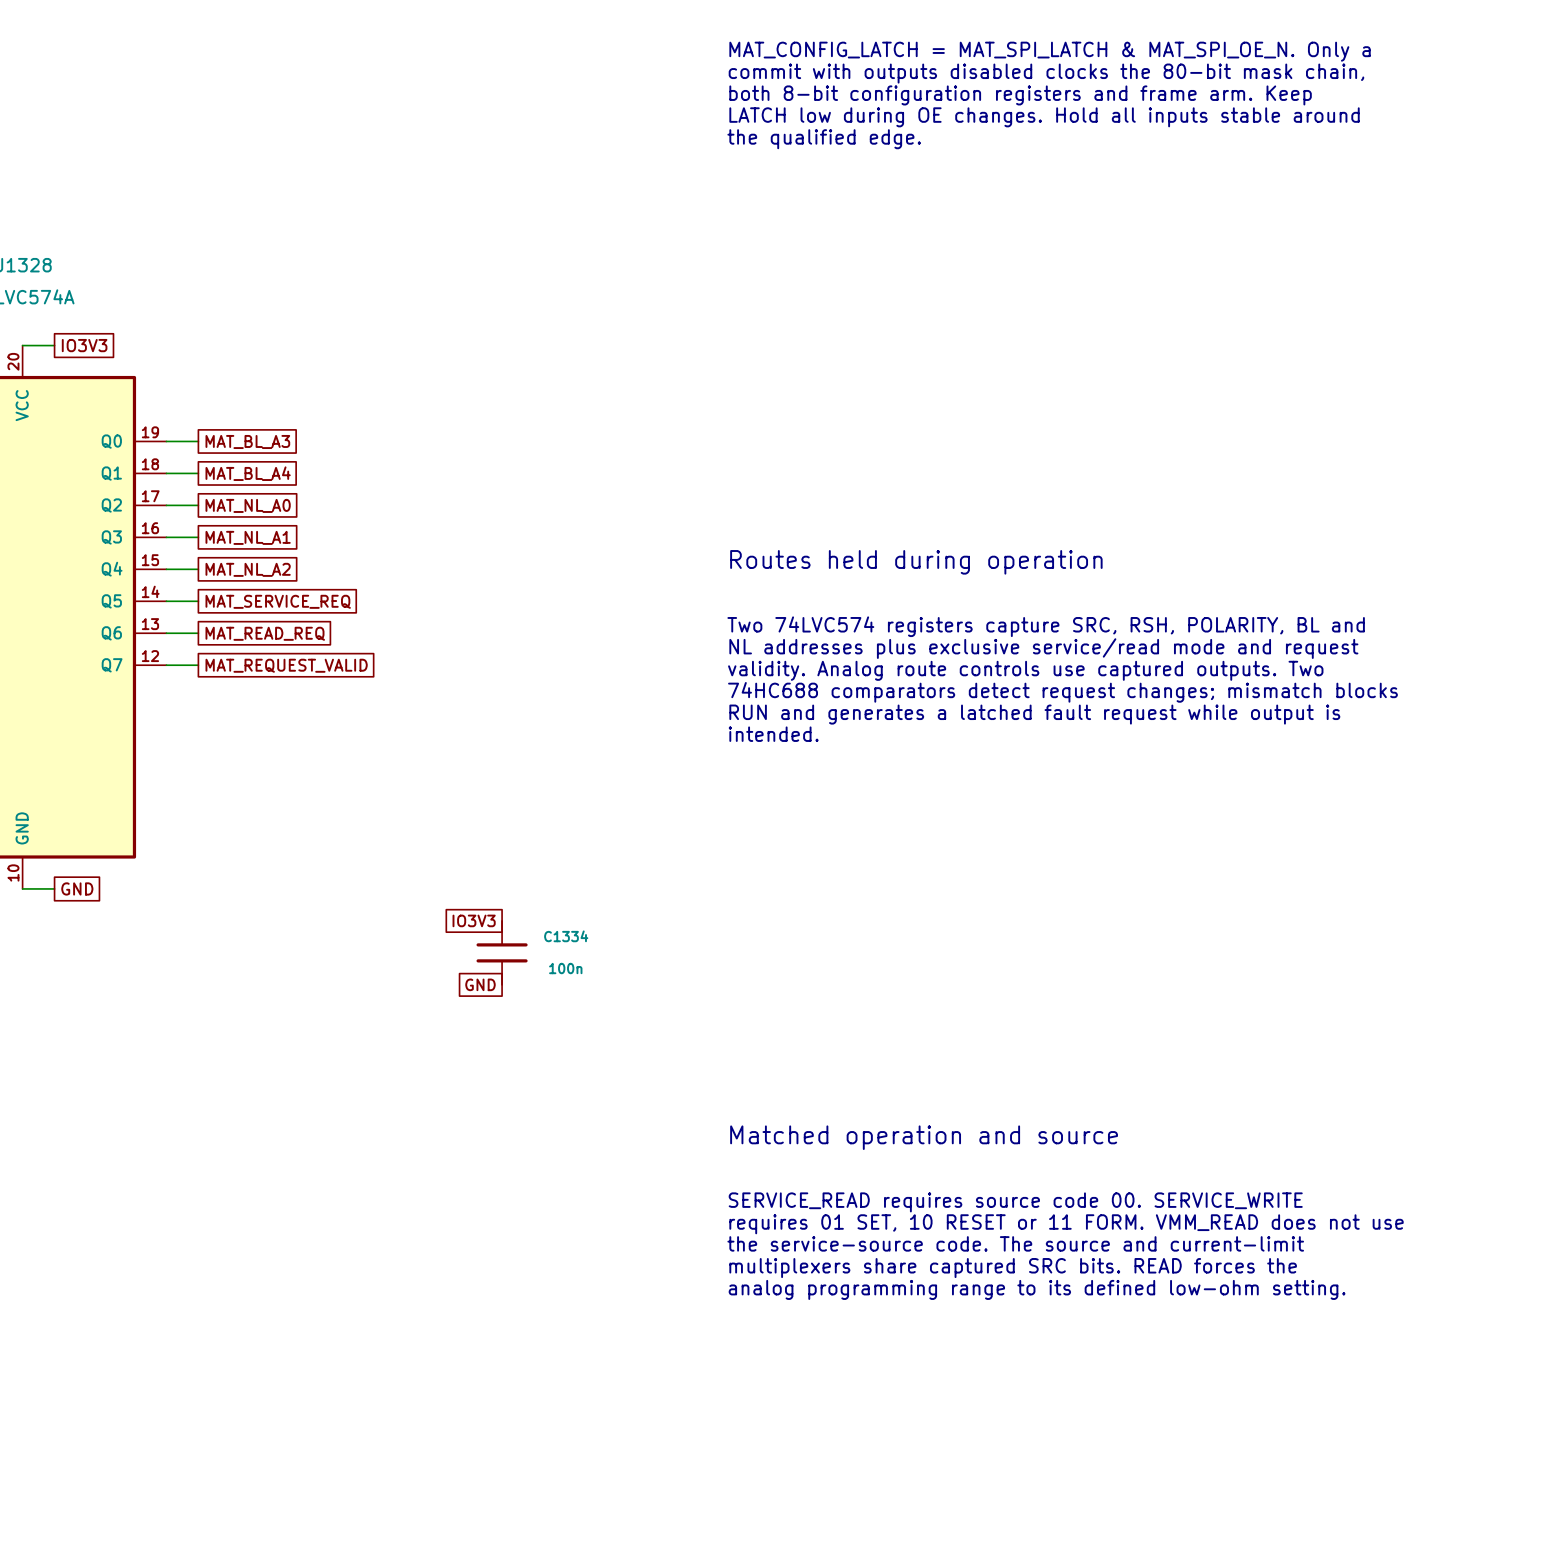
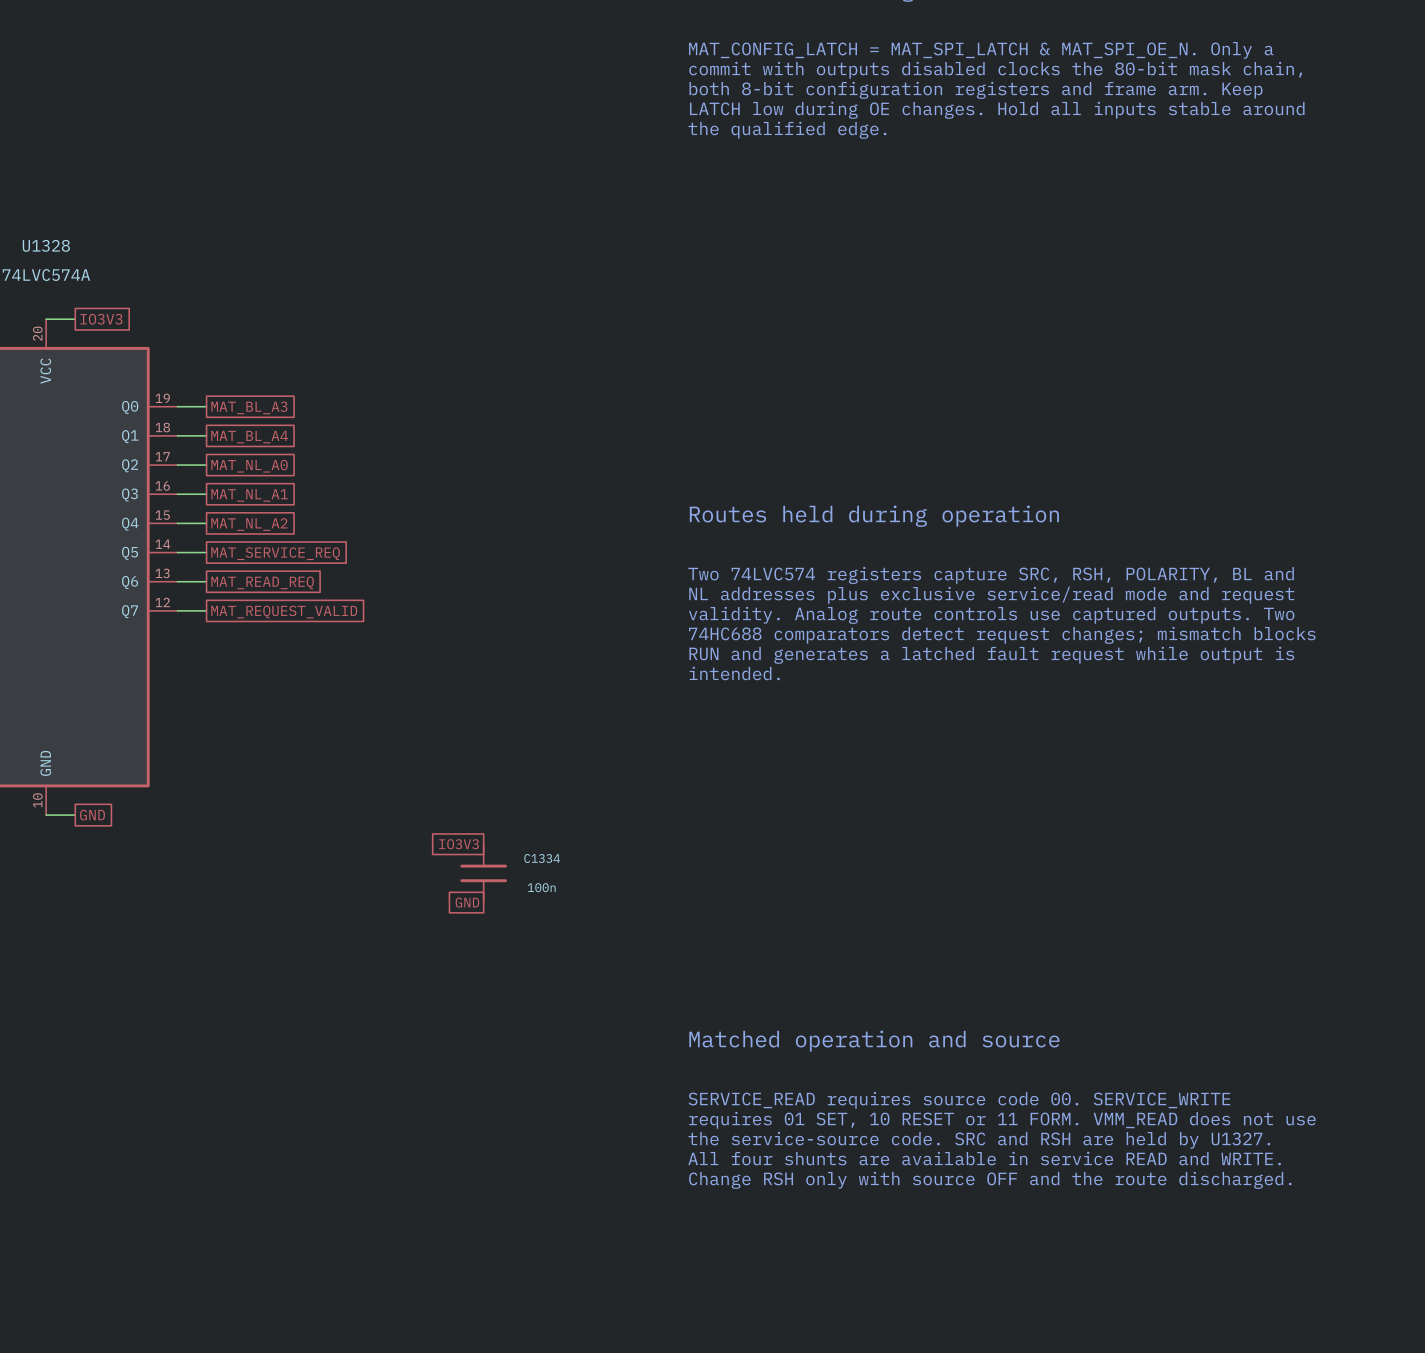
text: the service-source code. The source and current-limit (1015, 1243) -> the service-source code. SRC and RSH are held by U1327. (979, 1140)
text: multiplexers share captured SRC bits. READ forces the (1013, 1268) -> All four shunts are available in service READ and WRITE. (984, 1158)
text: analog programming range to its defined low-ohm setting. (1037, 1289) -> Change RSH only with source OFF and the route discharged. (990, 1180)

